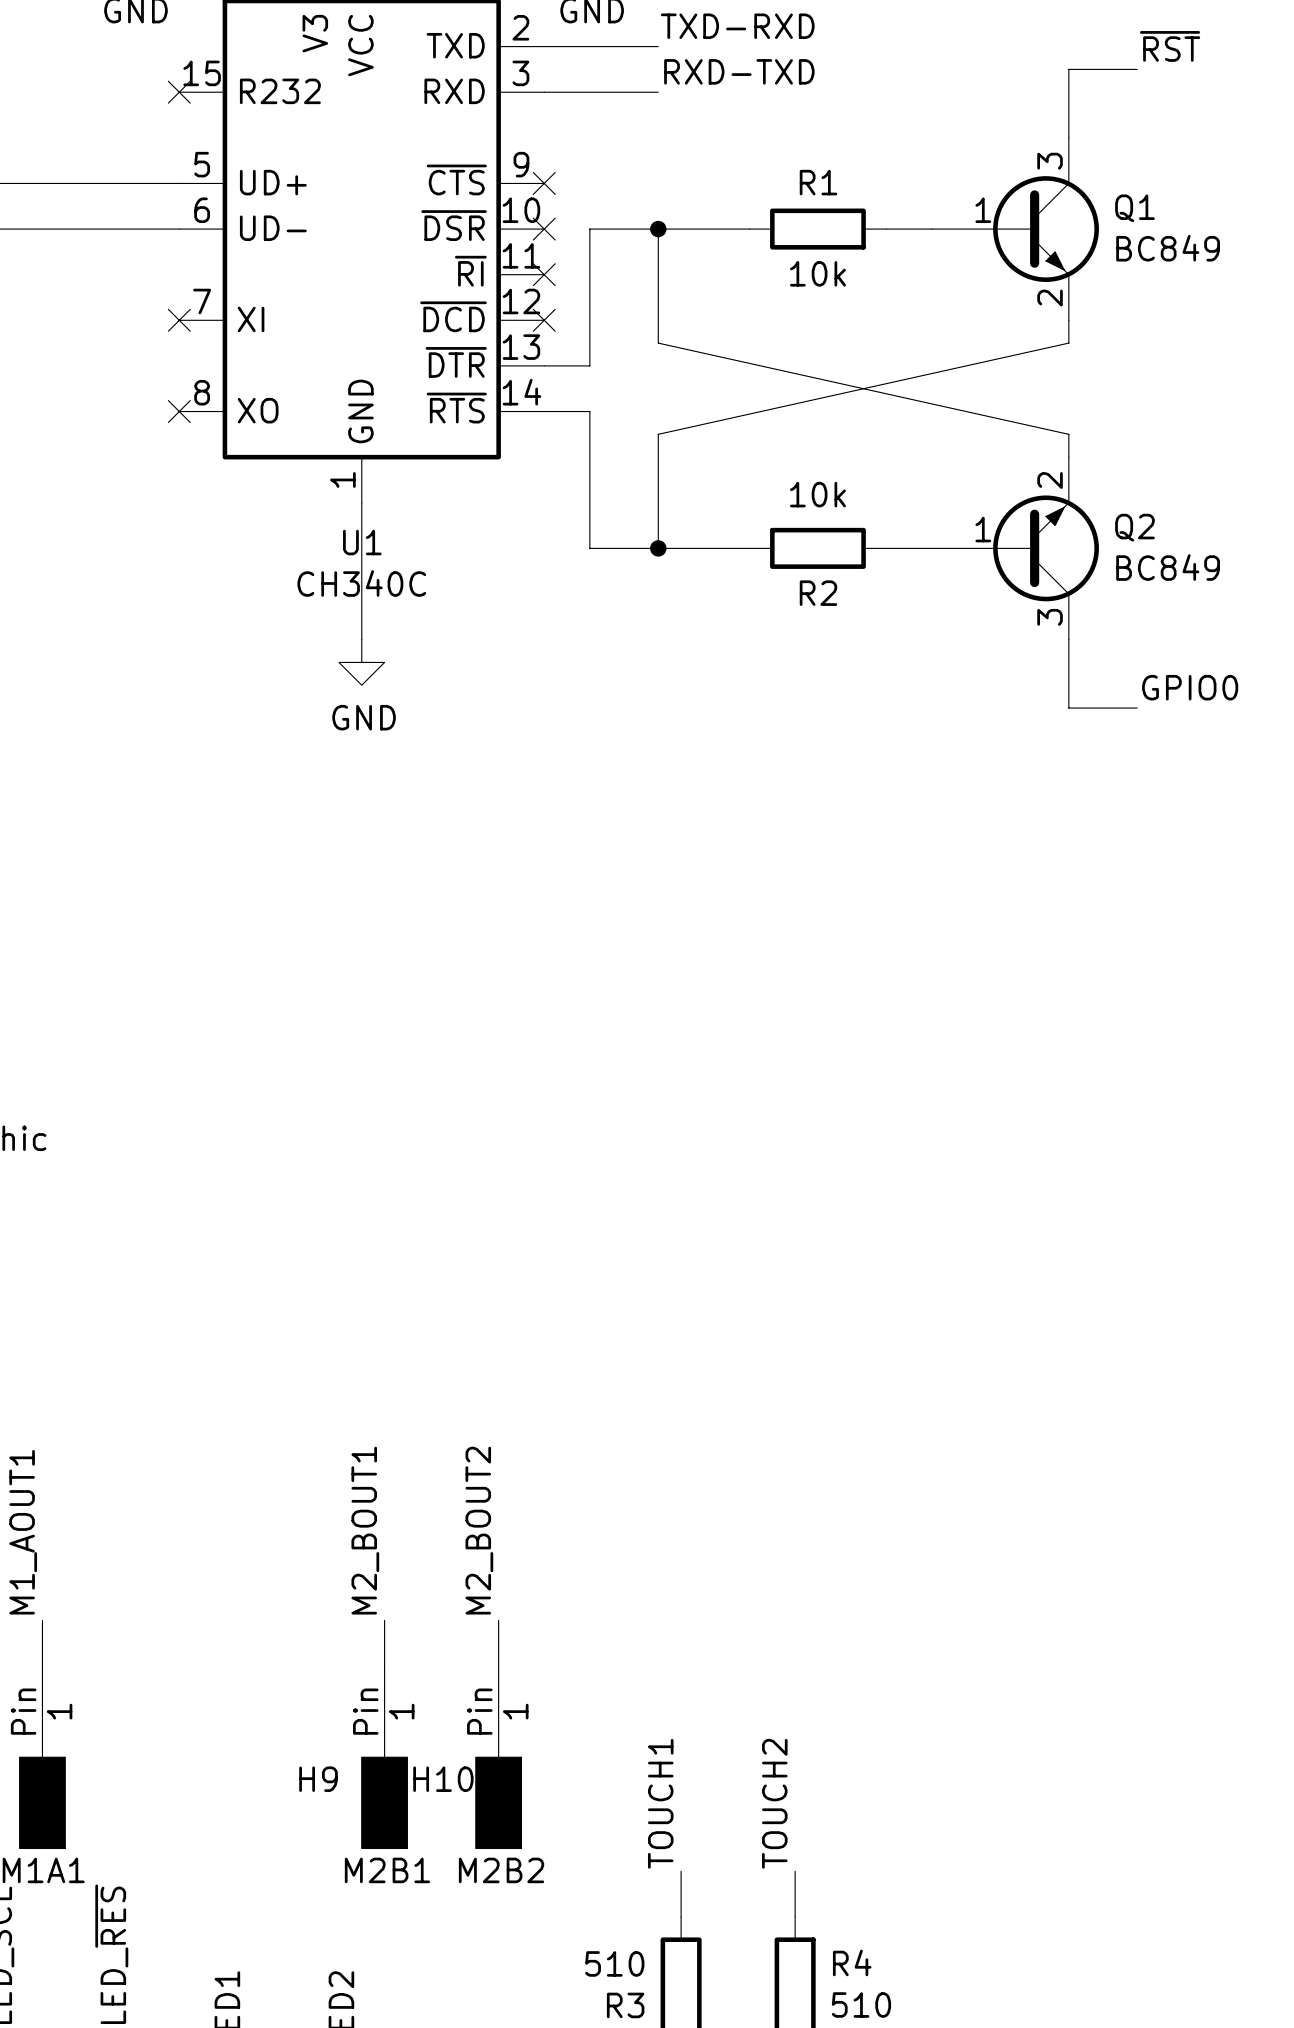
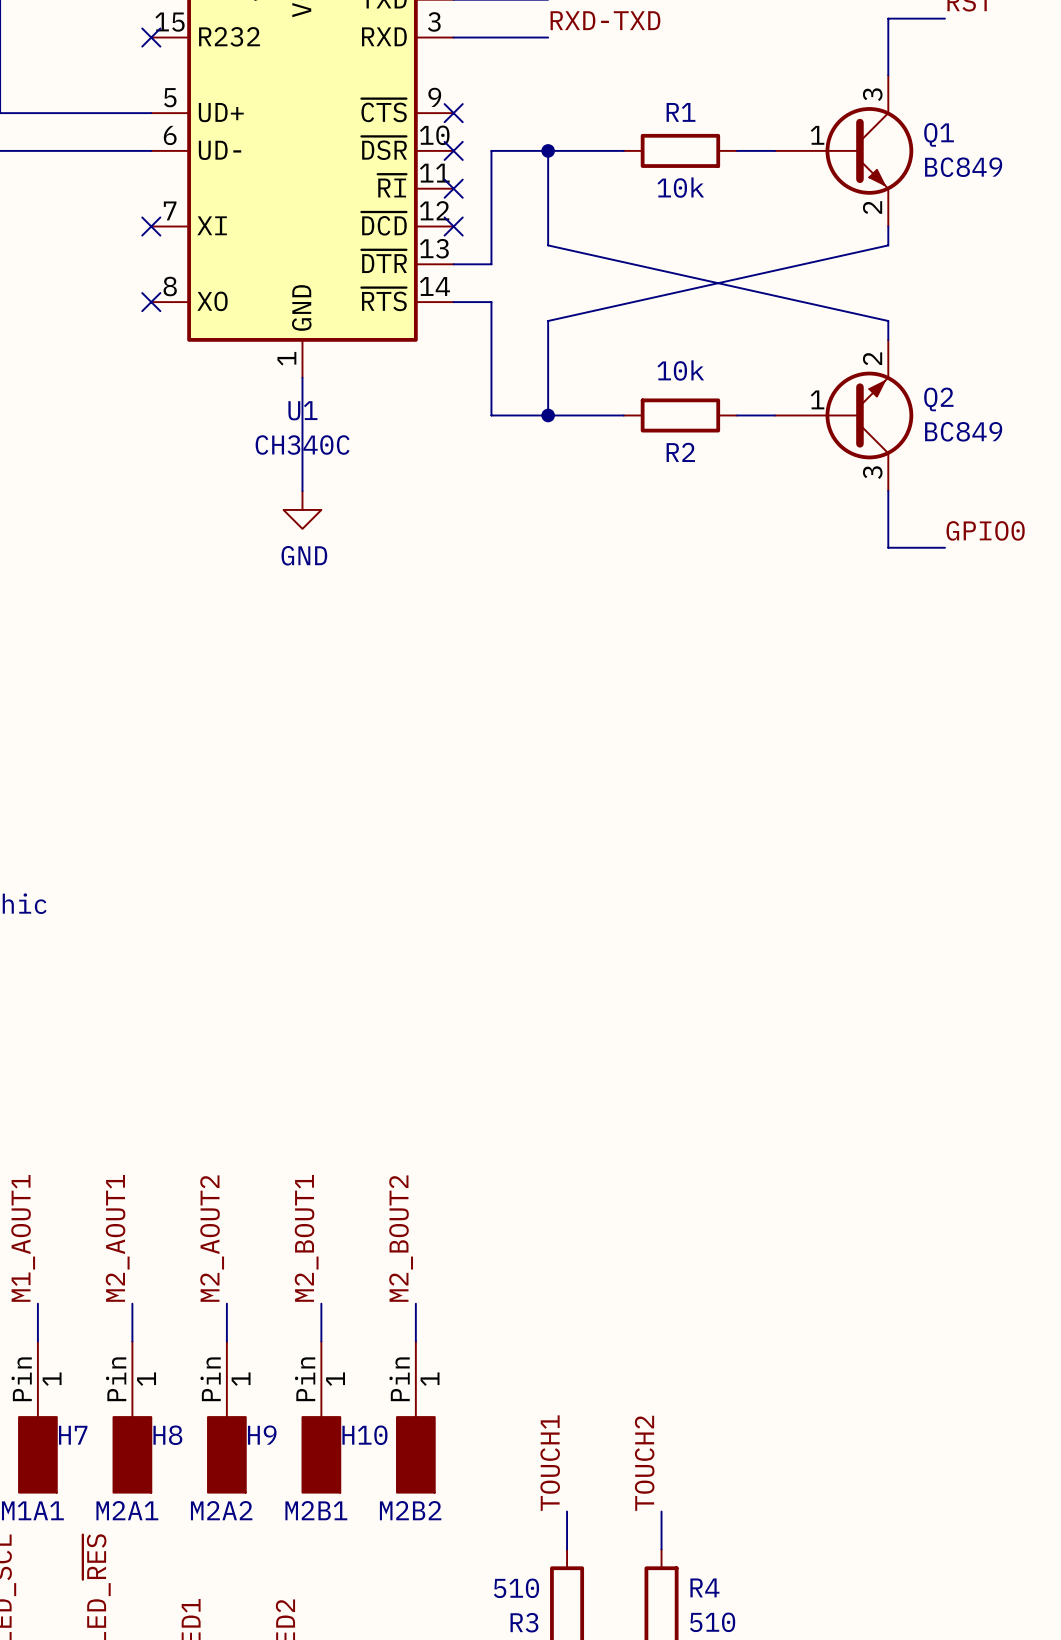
label: none -> M2_AOUT1 (117, 1238)
label: none -> M2_AOUT2 (212, 1238)
wire: none -> (132, 1303) (132, 1341)
wire: none -> (226, 1303) (226, 1341)
H7: none -> M2A1 (132, 1417)
H8: none -> M2A2 (226, 1417)

